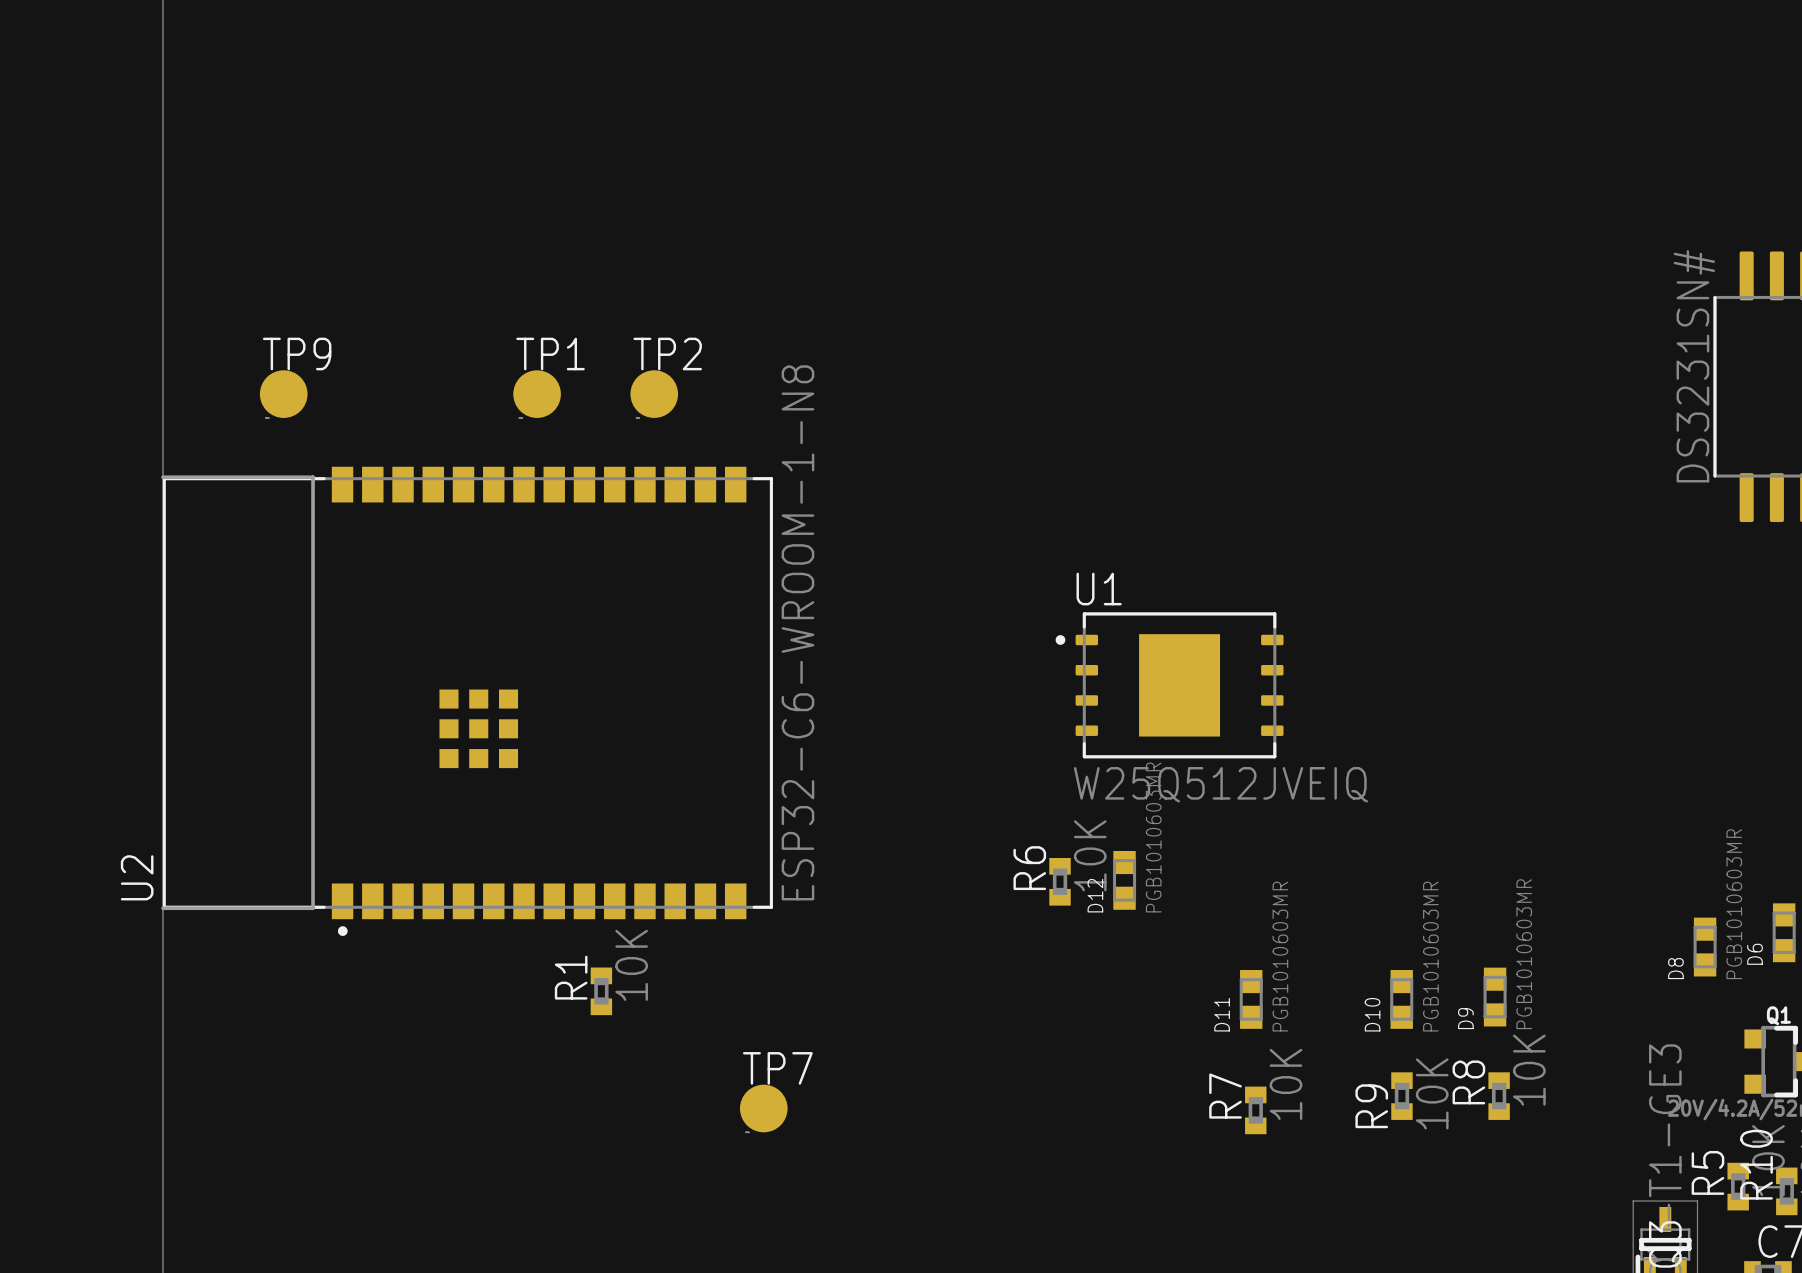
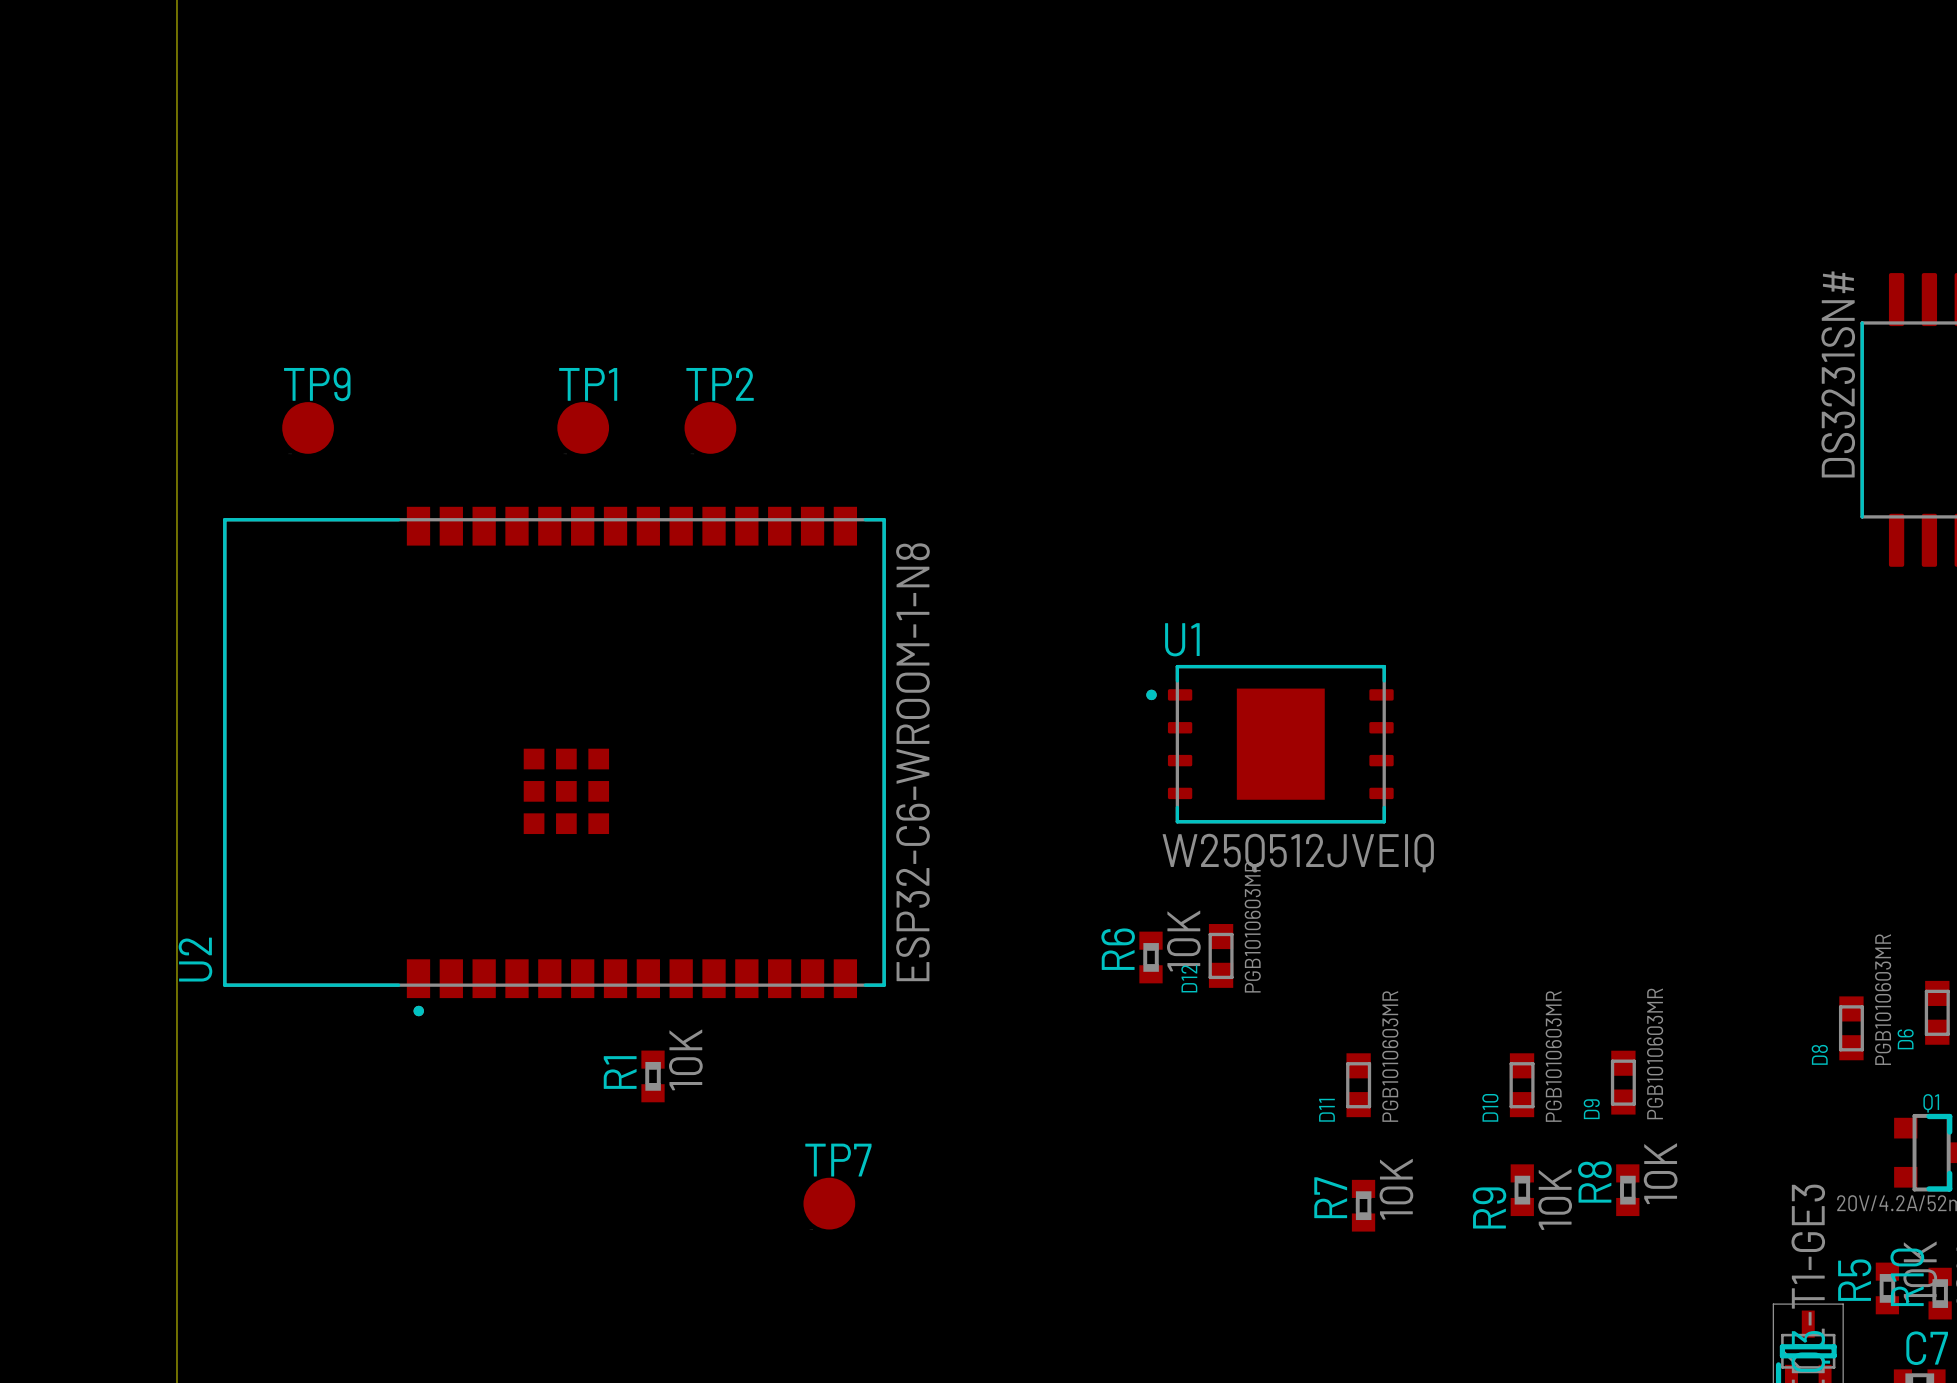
board edge: (162, 477) (313, 477) (313, 908) (162, 908) -> (176, 518) (176, 986)
U2 position: (467, 701) -> (554, 761)

